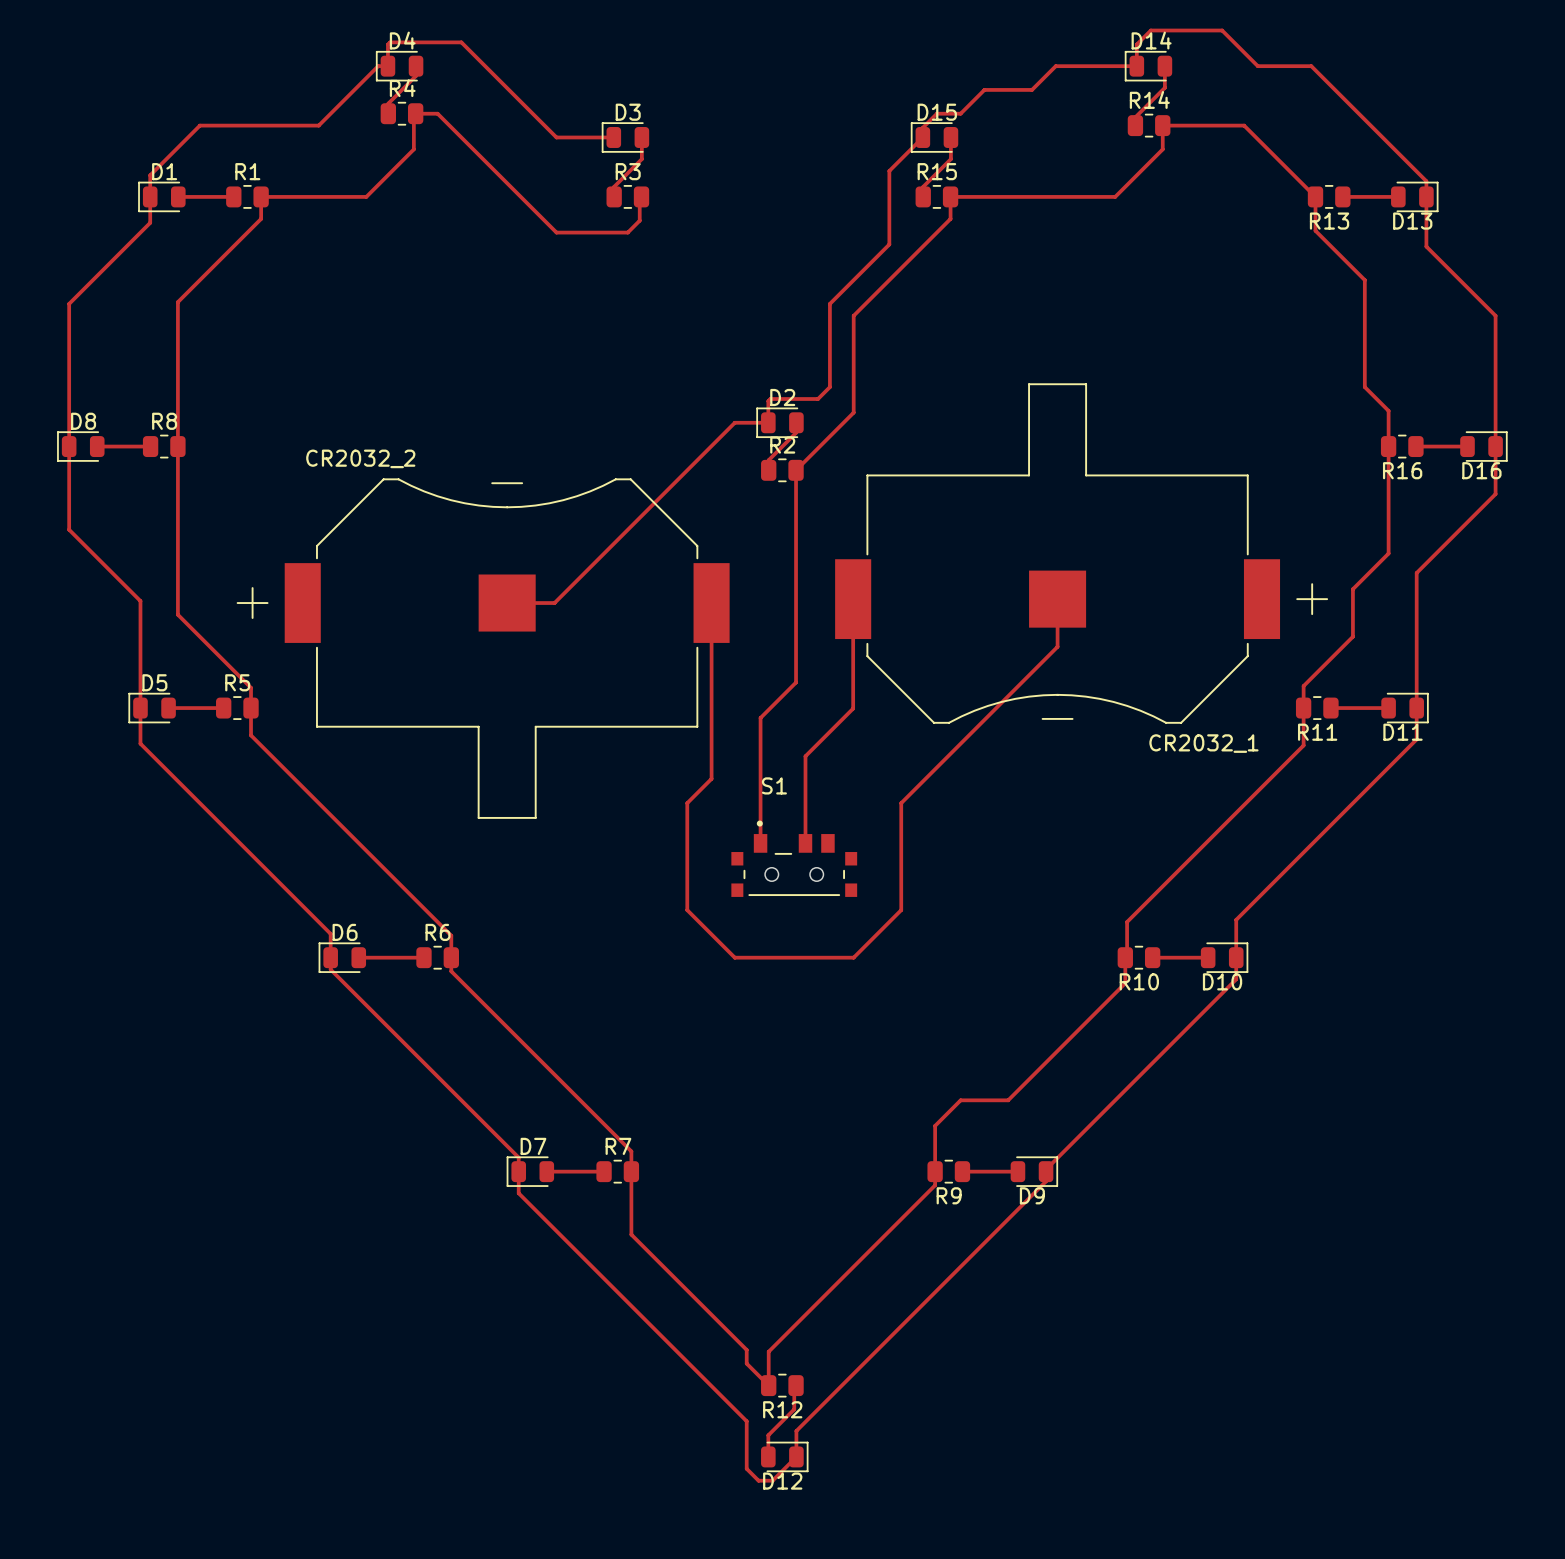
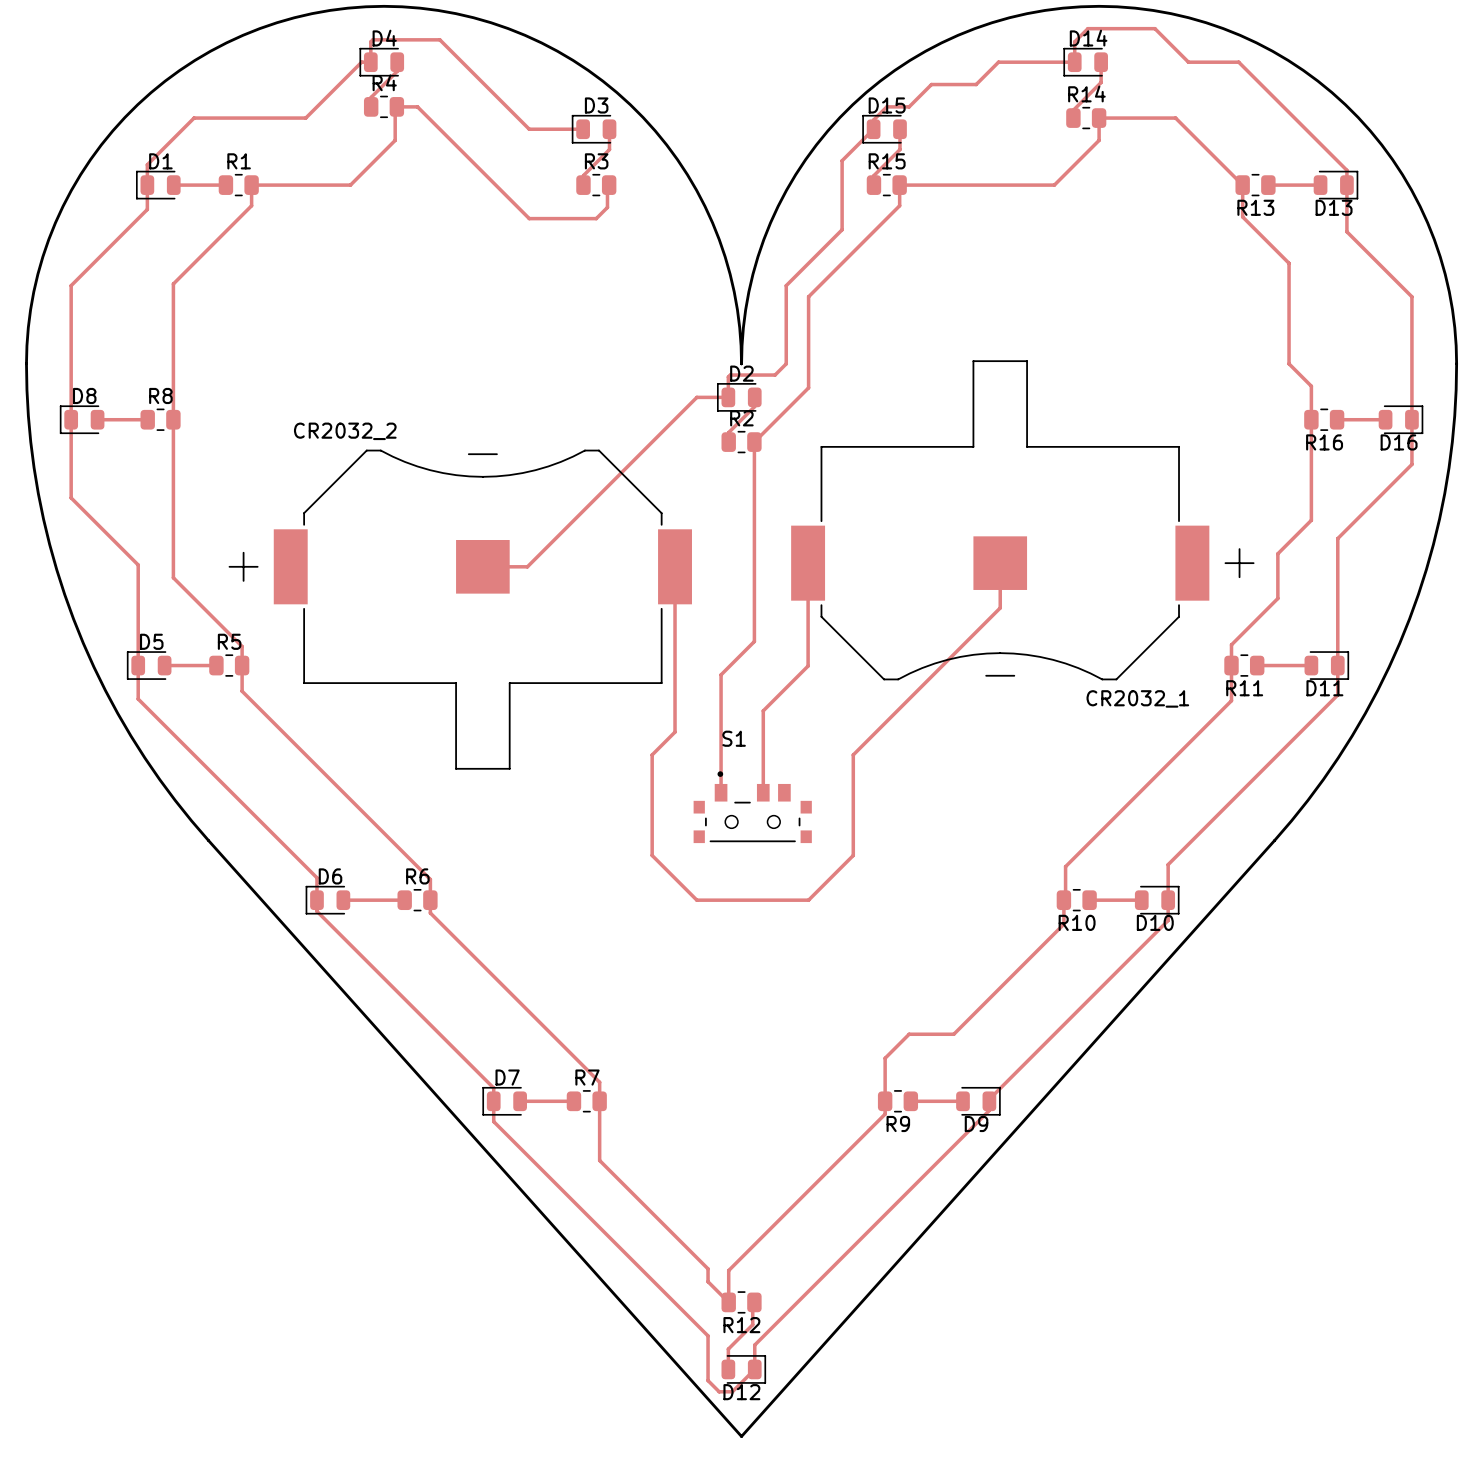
board edge: none -> (26, 363) (28, 416) (34, 467) (43, 519) (56, 569) (73, 619) (93, 667) (117, 713) (144, 758) (175, 800) (208, 840) (741, 1436) (1274, 840) (1307, 800) (1338, 758) (1365, 713) (1389, 667) (1409, 619) (1426, 569) (1439, 519) (1449, 467) (1454, 416) (1456, 363) (1452, 309) (1445, 274) (1434, 239) (1411, 190) (1381, 145) (1345, 104) (1303, 70) (1256, 42) (1206, 22) (1171, 13) (1135, 8) (1099, 6) (1044, 10) (1009, 17) (958, 35) (925, 51) (880, 81) (852, 104) (827, 130) (805, 159) (778, 206) (763, 239) (752, 274) (743, 327) (741, 363) (739, 327) (734, 291) (725, 256) (712, 222) (696, 190) (677, 159) (643, 117) (616, 92) (588, 70) (557, 51) (525, 35) (491, 22) (455, 13) (420, 8) (384, 6) (347, 8) (312, 13) (276, 22) (243, 35) (210, 51) (179, 70) (151, 92) (124, 117) (101, 145) (80, 174) (55, 222) (42, 256) (33, 291) (28, 327) (26, 363)

